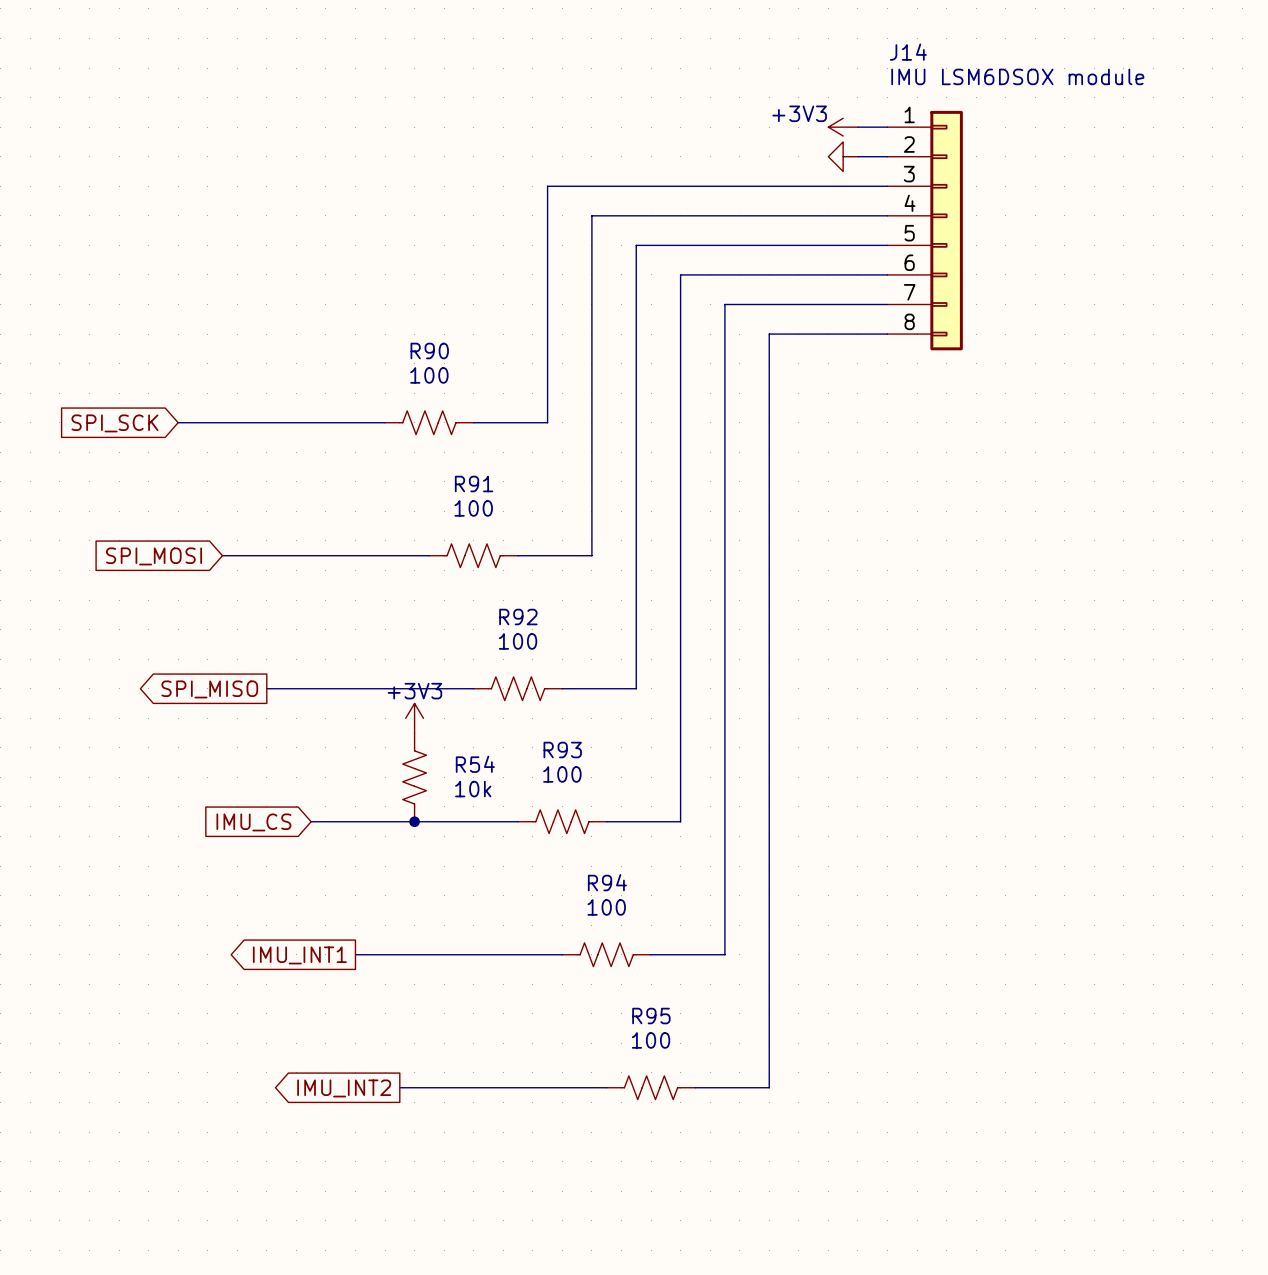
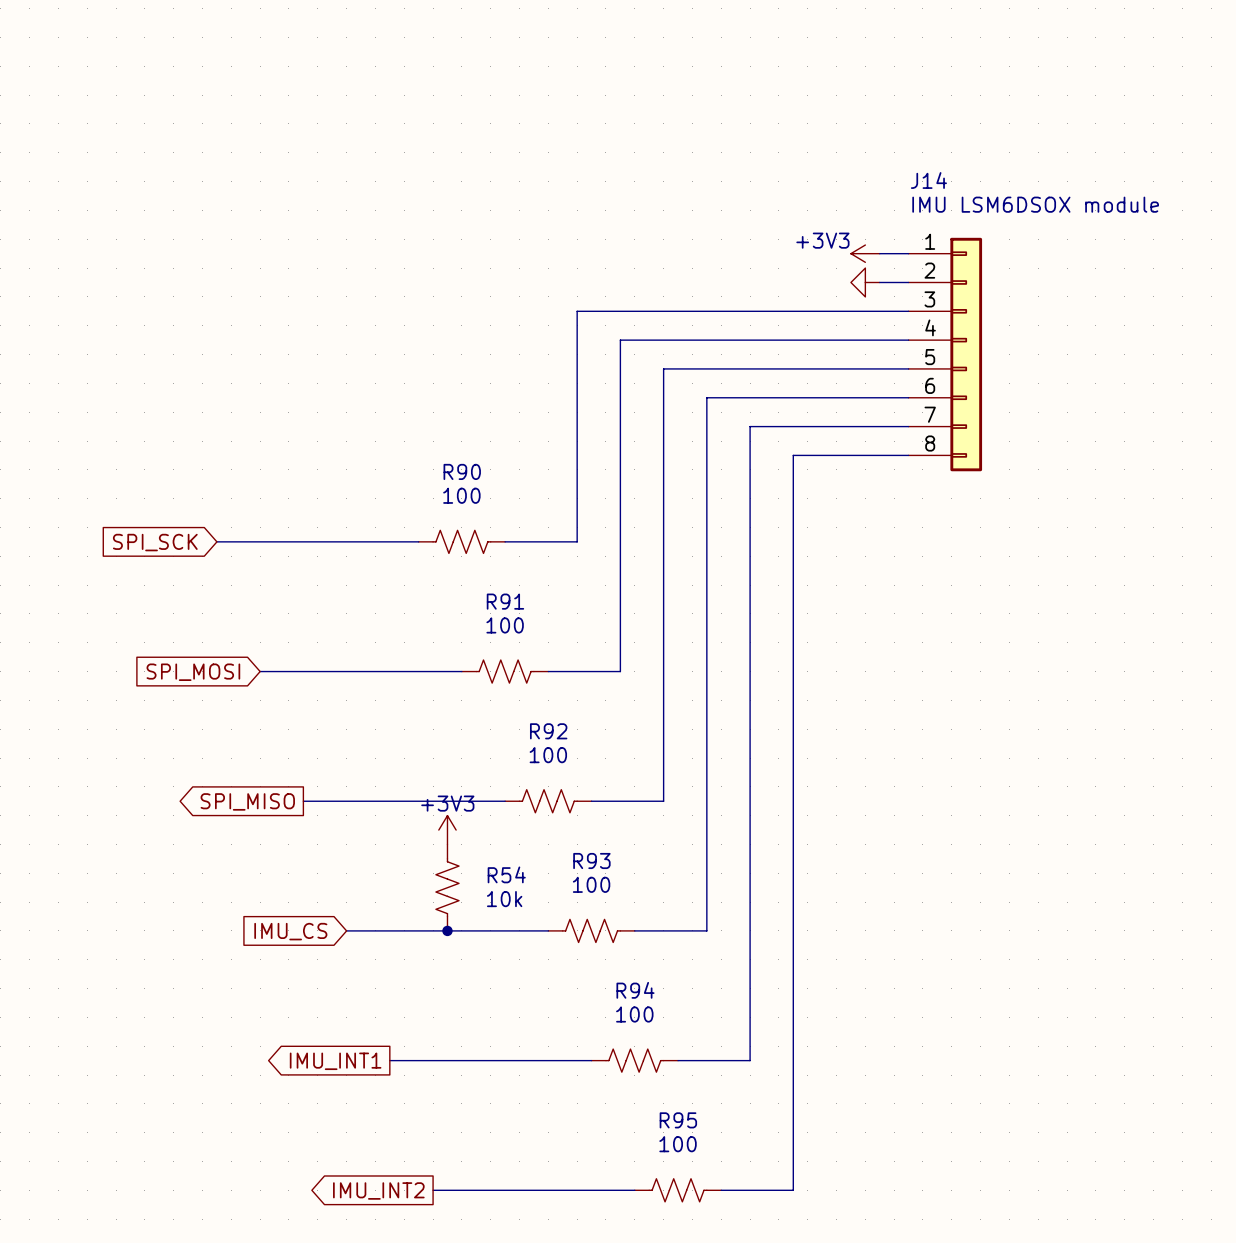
power symbol position: +3V3 (843, 127) -> +3V3 (865, 253)
wire: (857, 127) (887, 127) -> (879, 253) (908, 253)
power symbol position: (843, 156) -> (865, 282)
wire: (857, 156) (887, 156) -> (879, 282) (908, 282)
wire: (887, 186) (547, 186) (547, 422) (473, 422) -> none
wire: (887, 215) (591, 215) (591, 319) -> (908, 311) (577, 311)
J14 position: (925, 230) -> (945, 354)
wire: (887, 245) (636, 245) (636, 348) -> (908, 340) (620, 340)
wire: (887, 274) (680, 274) (680, 378) -> (908, 368) (663, 368)
wire: (887, 304) (724, 304) (724, 407) -> (908, 397) (706, 397)
wire: (887, 334) (769, 334) (769, 437) -> (908, 426) (750, 426)
wire: (178, 422) (385, 422) -> none
R90: 100 (429, 422) -> none
global label: SPI_SCK (114, 423) -> none
wire: none -> (908, 455) (793, 455) (793, 1190) (721, 1190)
R91 name: R91 (474, 484) -> R90 (462, 471)
global label: SPI_MOSI (154, 556) -> SPI_SCK (155, 542)
R92 name: R92 (518, 617) -> R91 (505, 601)
global label shape: output (209, 689) -> input (193, 672)
global label: SPI_MISO (209, 689) -> SPI_MOSI (193, 672)
power symbol position: +3V3 (414, 718) -> +3V3 (447, 830)
R93 name: R93 (562, 750) -> R92 (548, 731)
R54 position: (414, 777) -> (447, 887)
junction: (414, 821) -> none
global label shape: input (253, 822) -> output (247, 801)
global label: IMU_CS (253, 822) -> SPI_MISO (247, 801)
R94 name: R94 (607, 882) -> R93 (591, 860)
junction: none -> (447, 930)
global label shape: output (299, 955) -> input (290, 931)
global label: IMU_INT1 (299, 955) -> IMU_CS (290, 931)
R95 name: R95 (651, 1016) -> R94 (635, 990)
global label: IMU_INT2 (344, 1088) -> IMU_INT1 (335, 1061)
wire: none -> (433, 1190) (634, 1190)
R95: none -> 100 (678, 1190)
global label: none -> IMU_INT2 (378, 1190)

